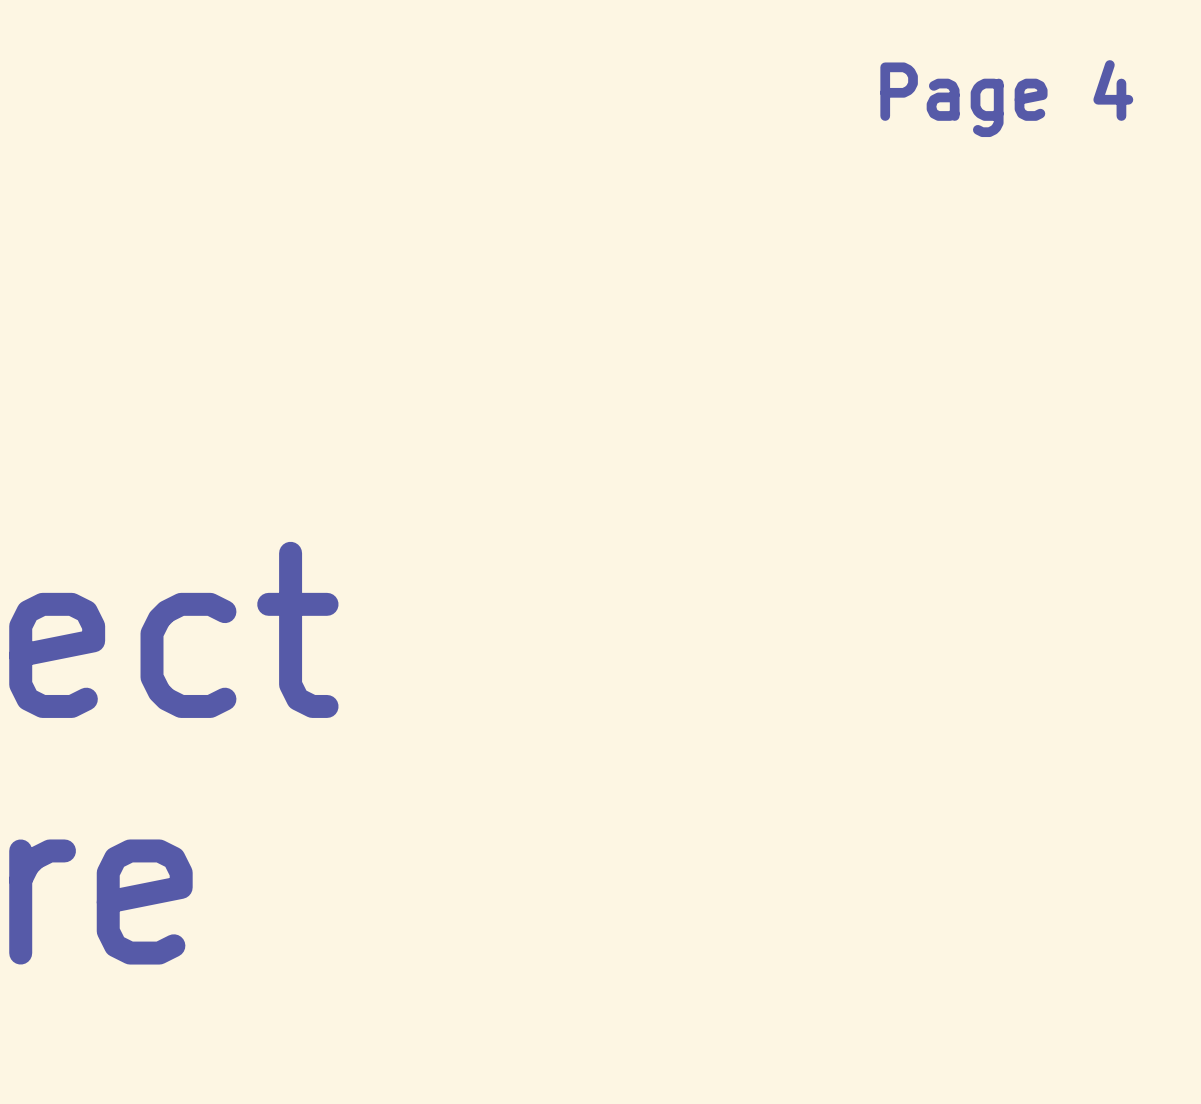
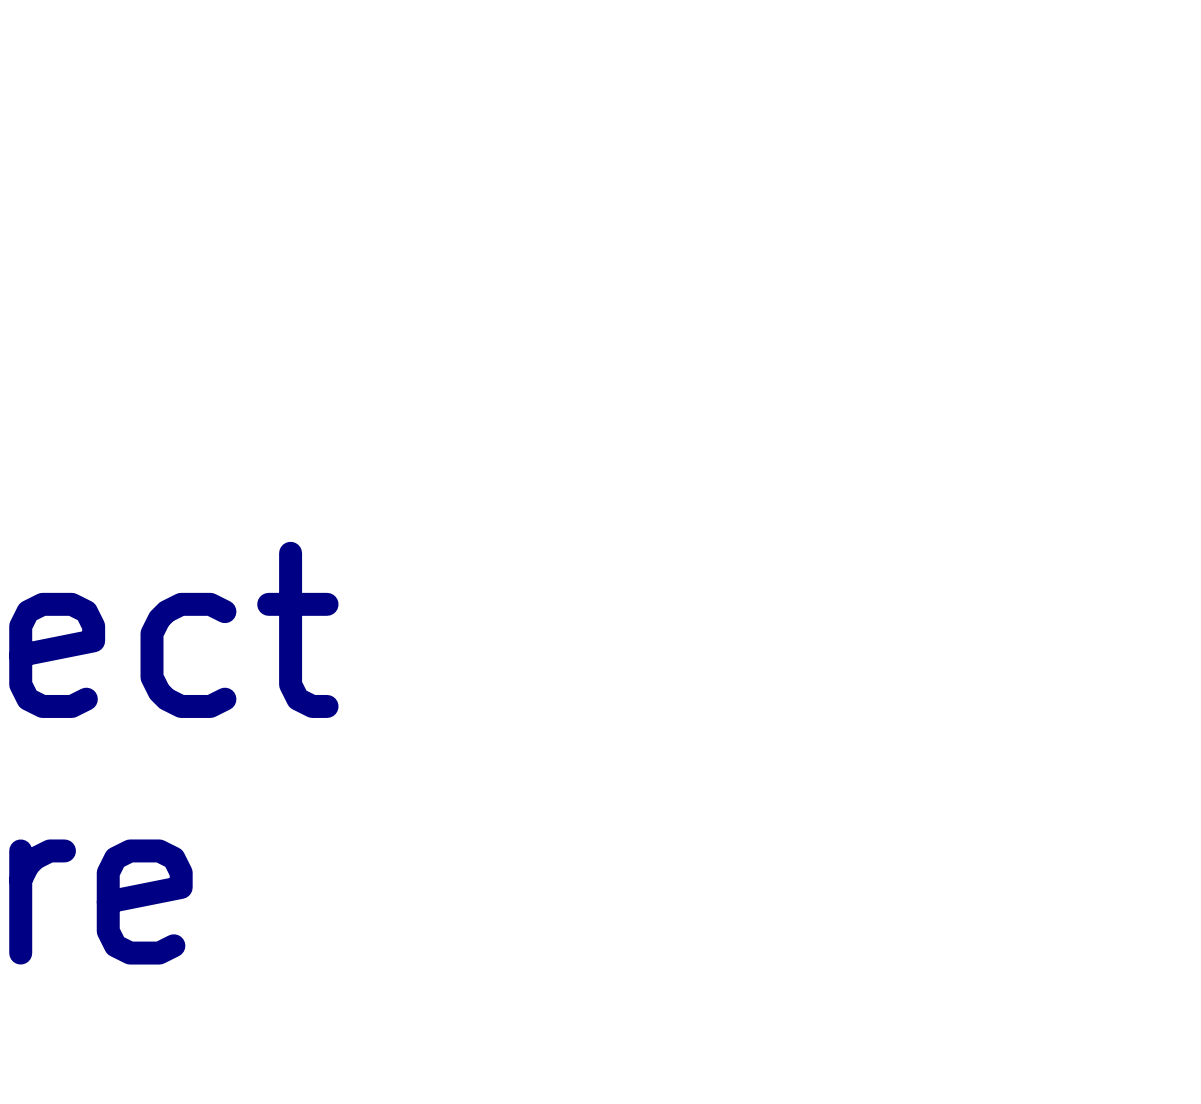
text: Page 4 (1006, 98) -> none

